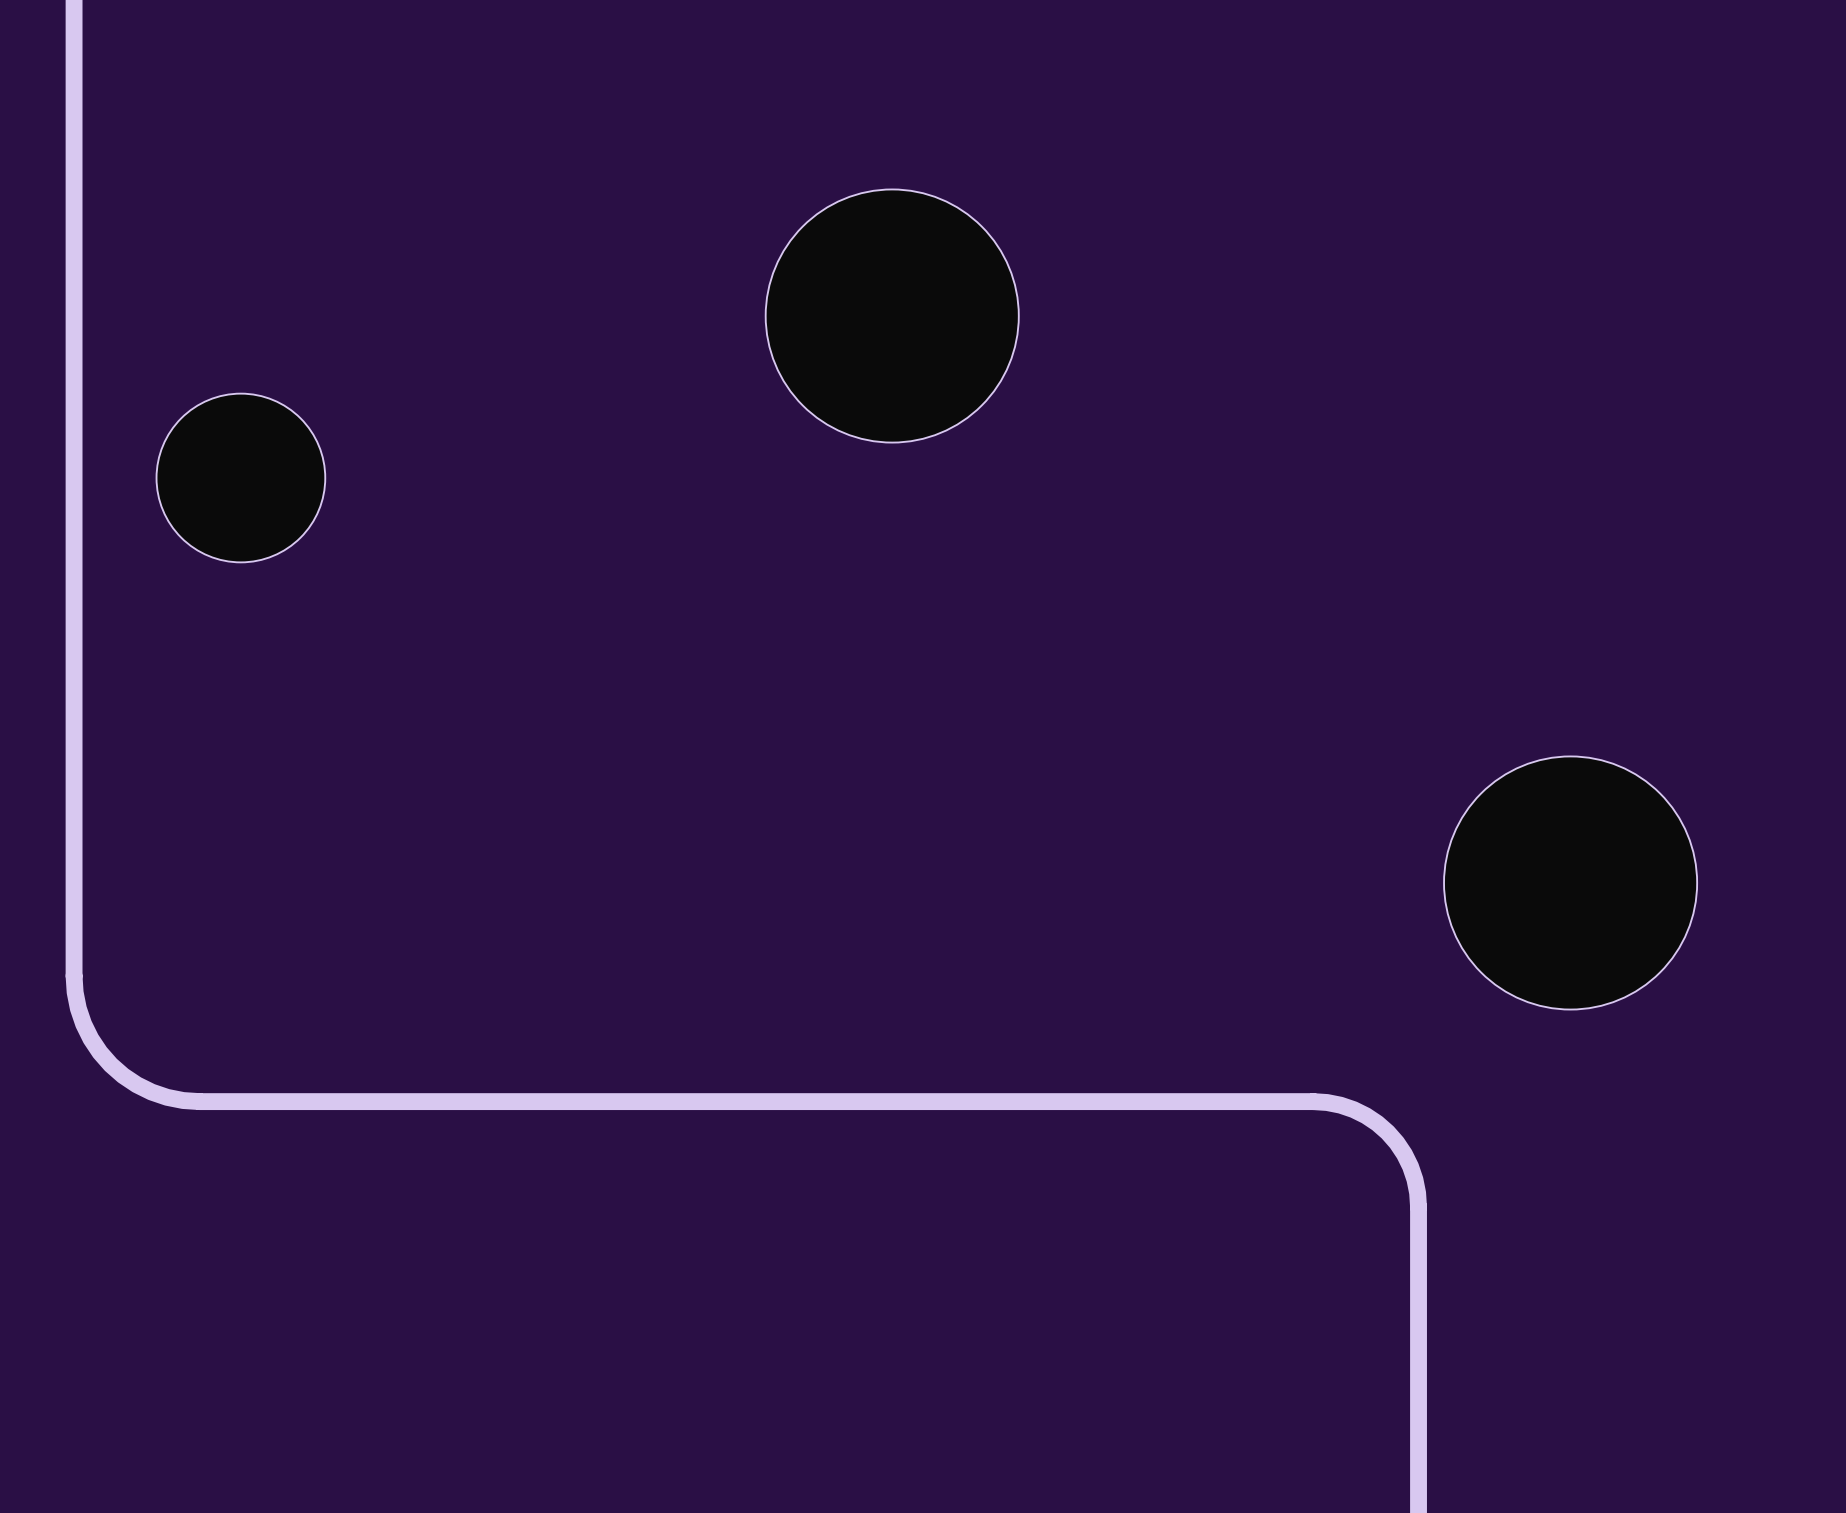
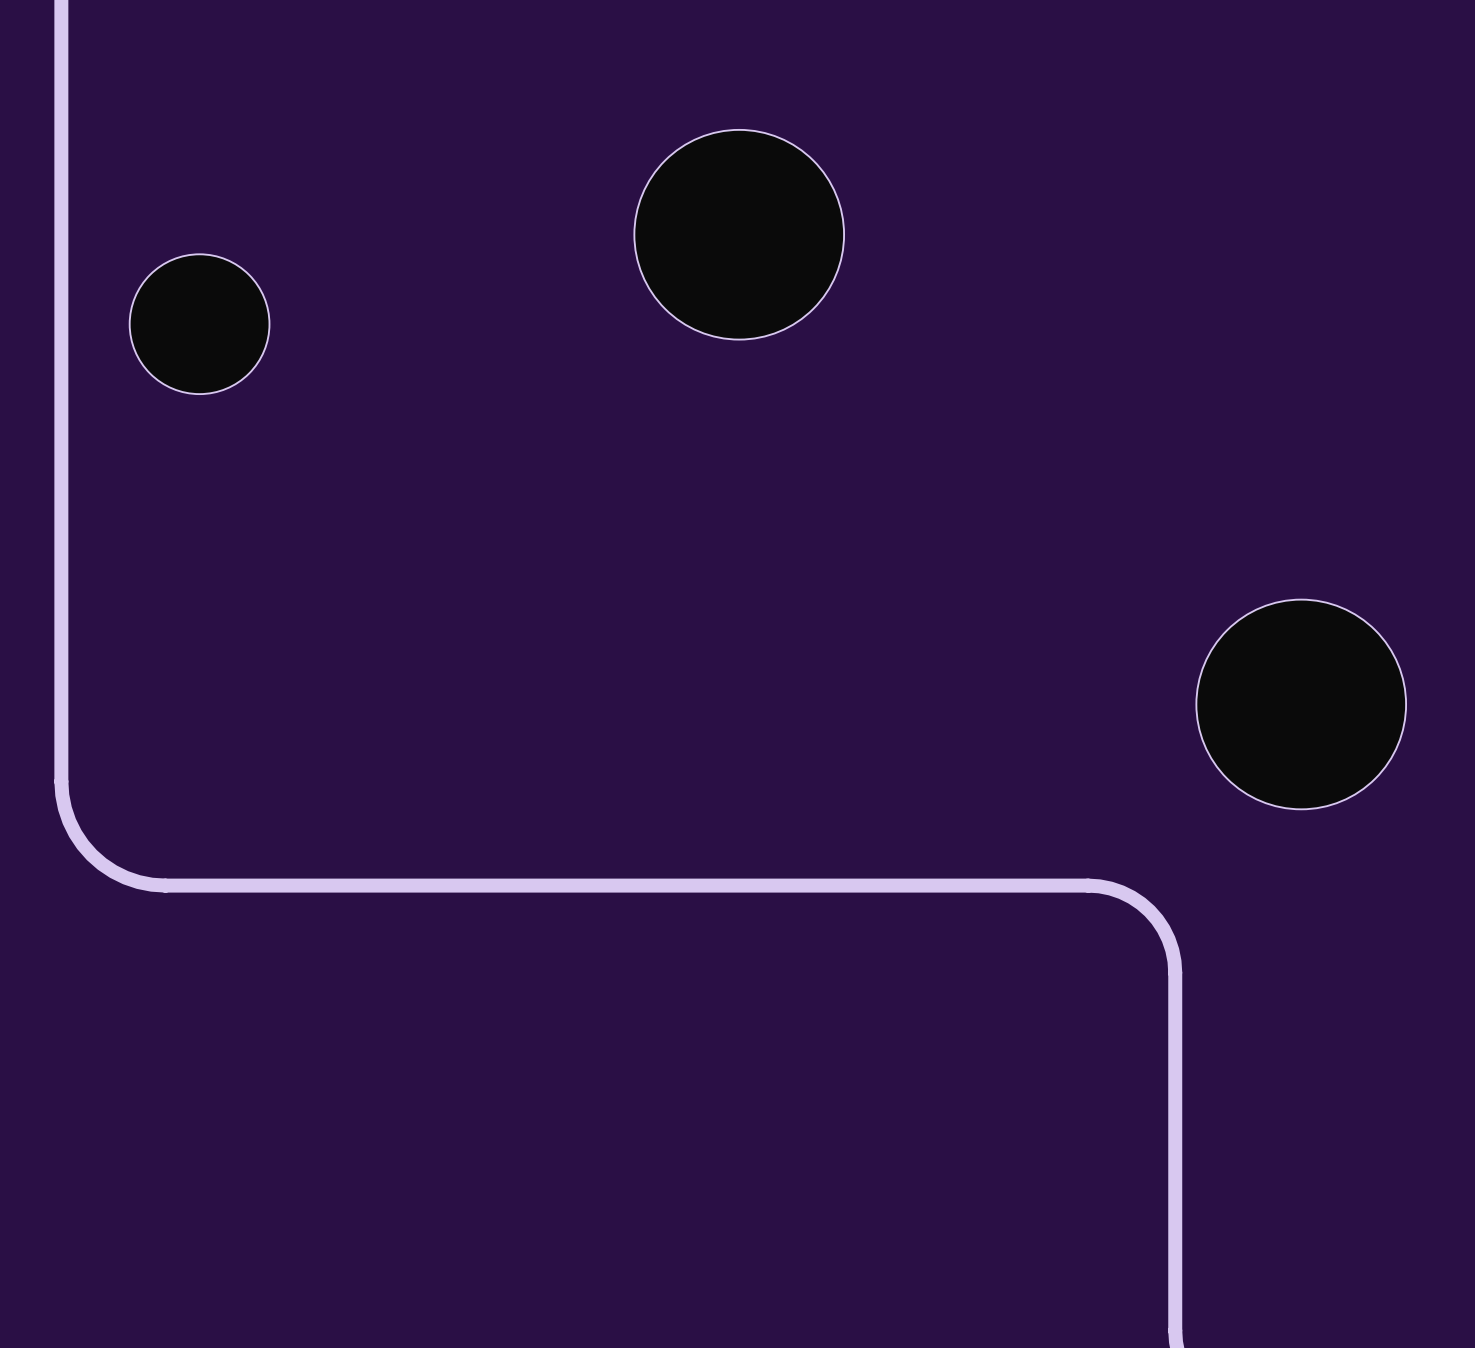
hole position: (240, 478) -> (199, 324)

